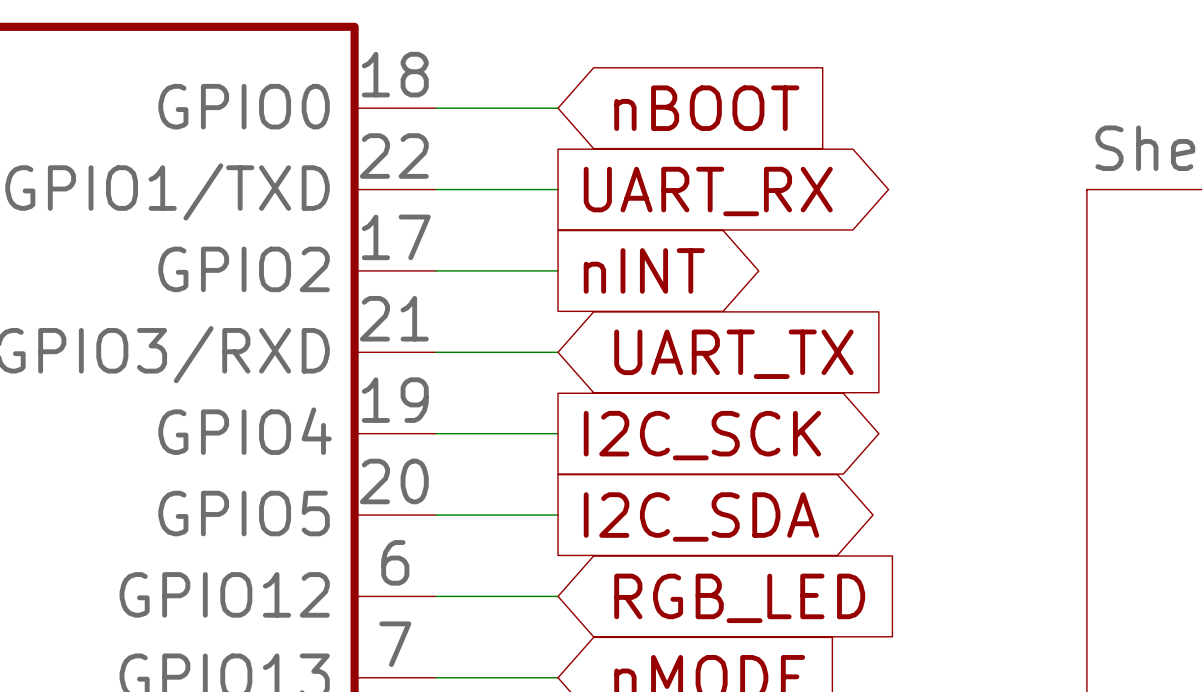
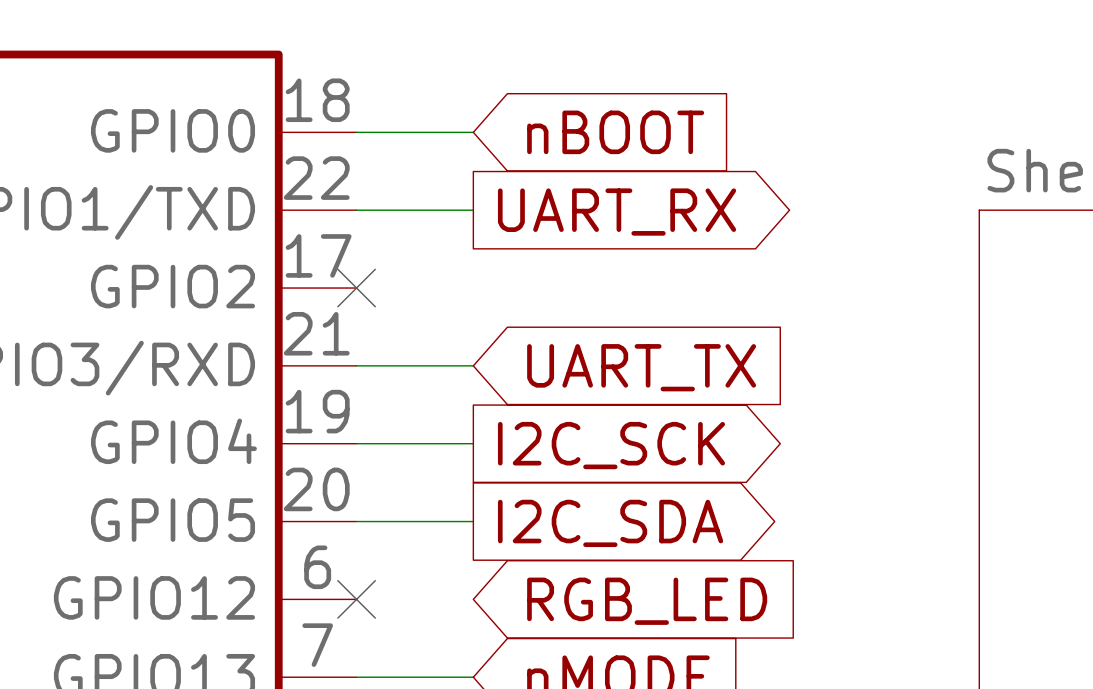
wire: (435, 270) (558, 270) -> none
no-connect mark: none -> (356, 288)
global label: nINT (644, 270) -> none
wire: (435, 596) (558, 596) -> none
no-connect mark: none -> (356, 599)

